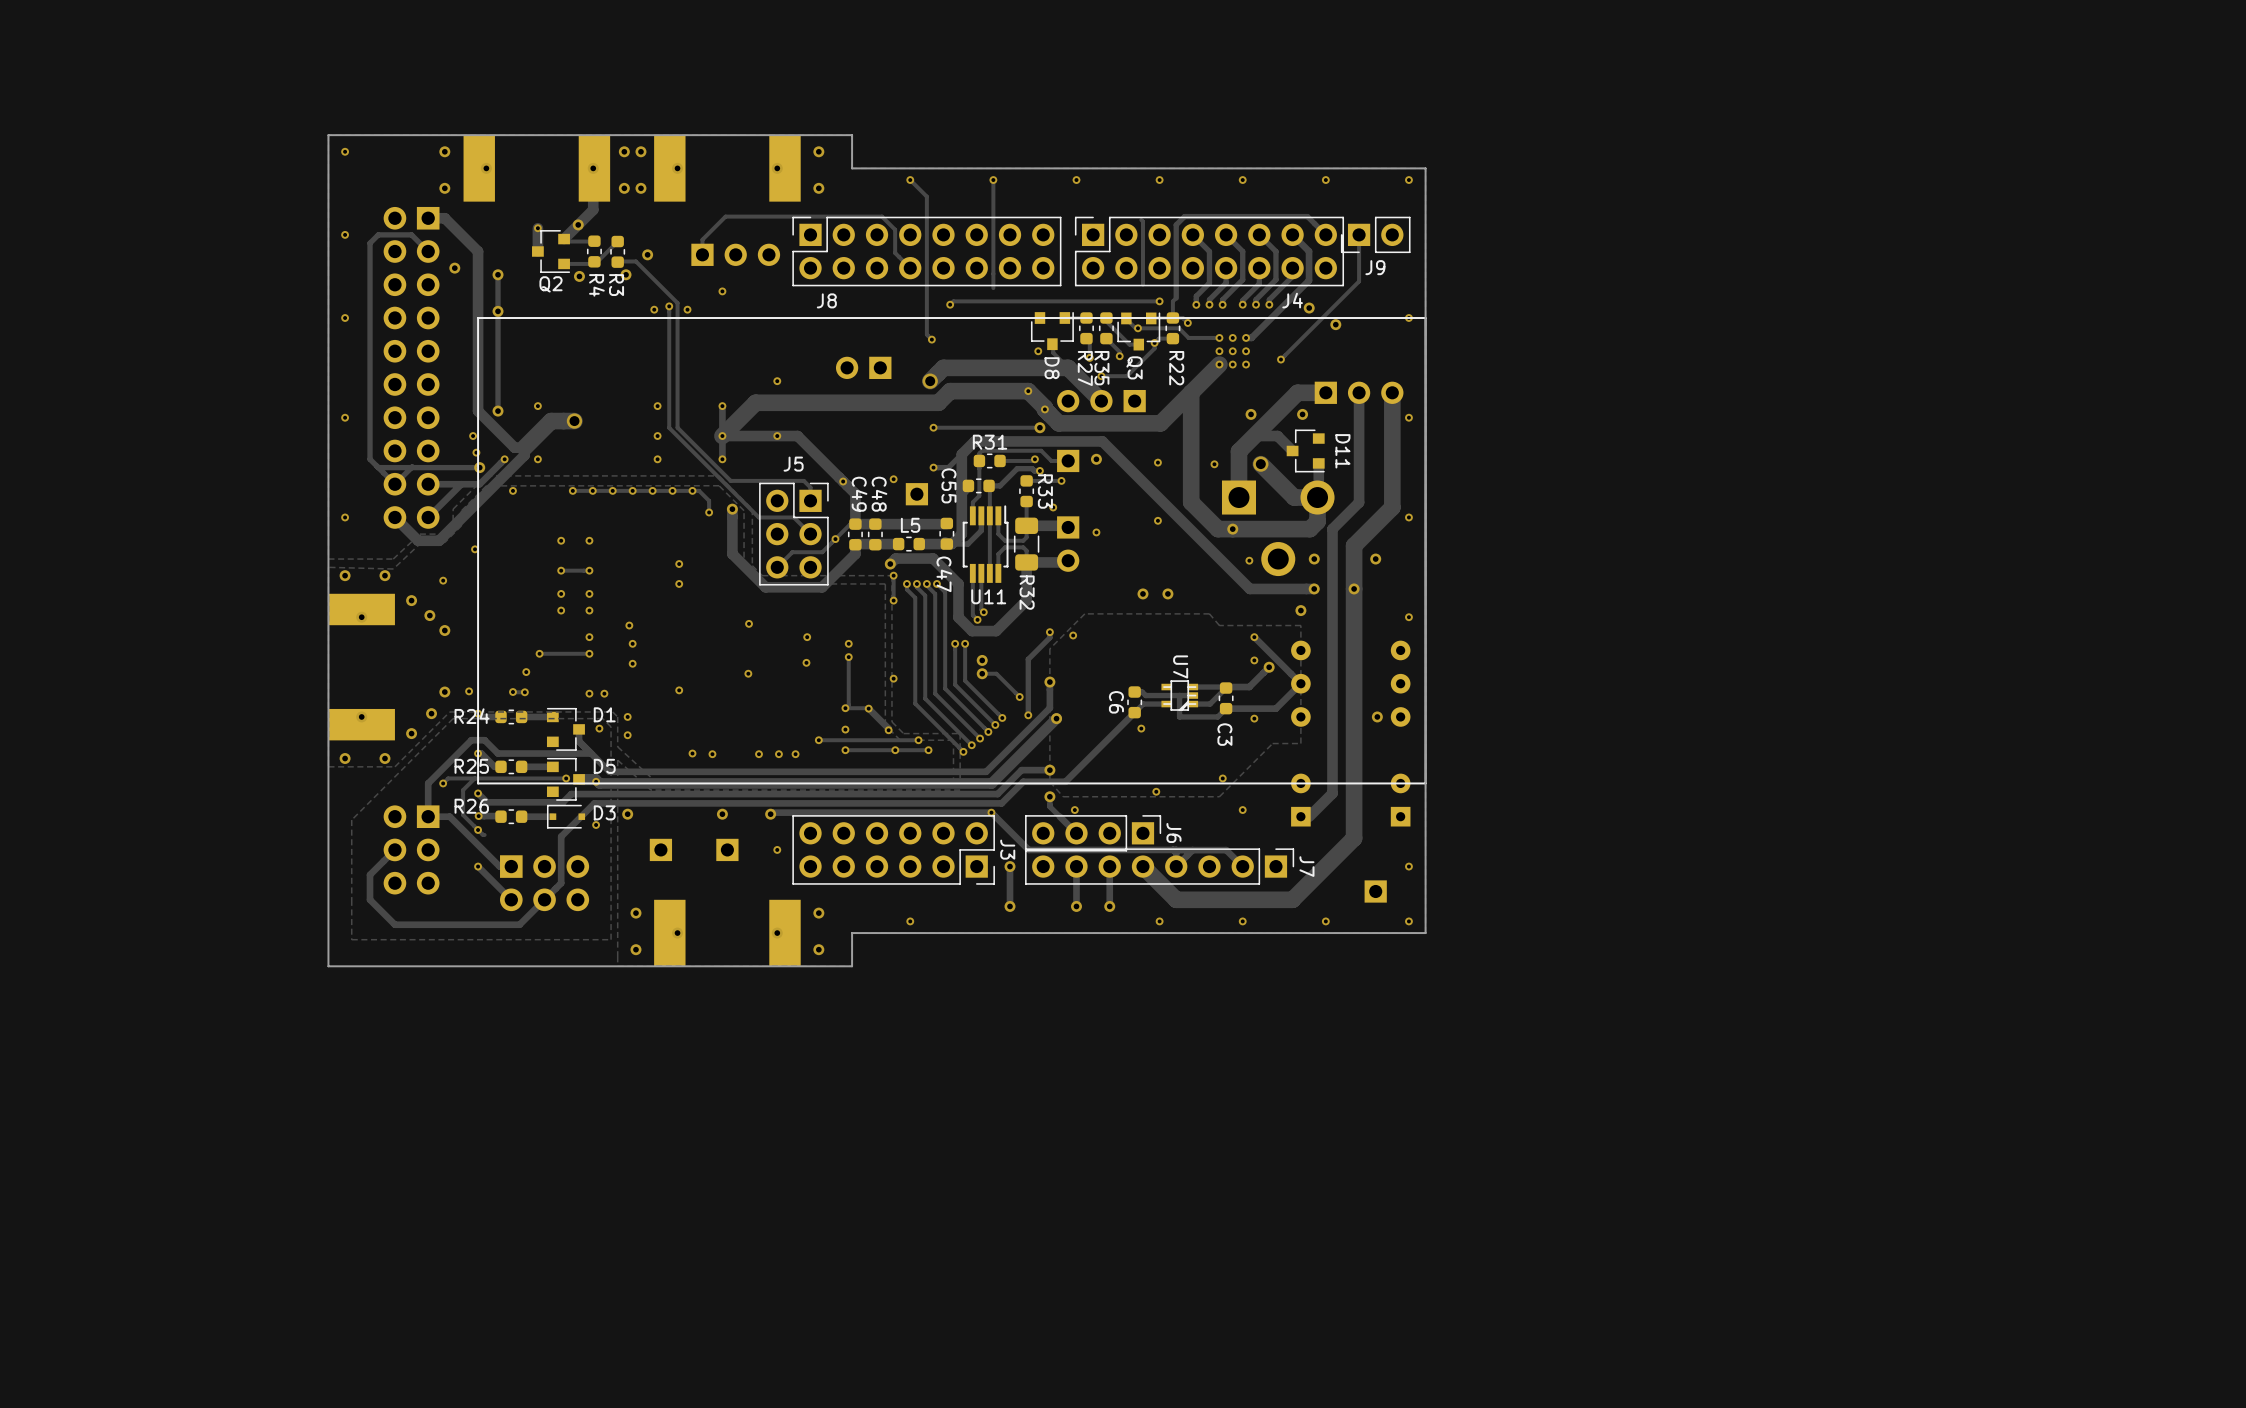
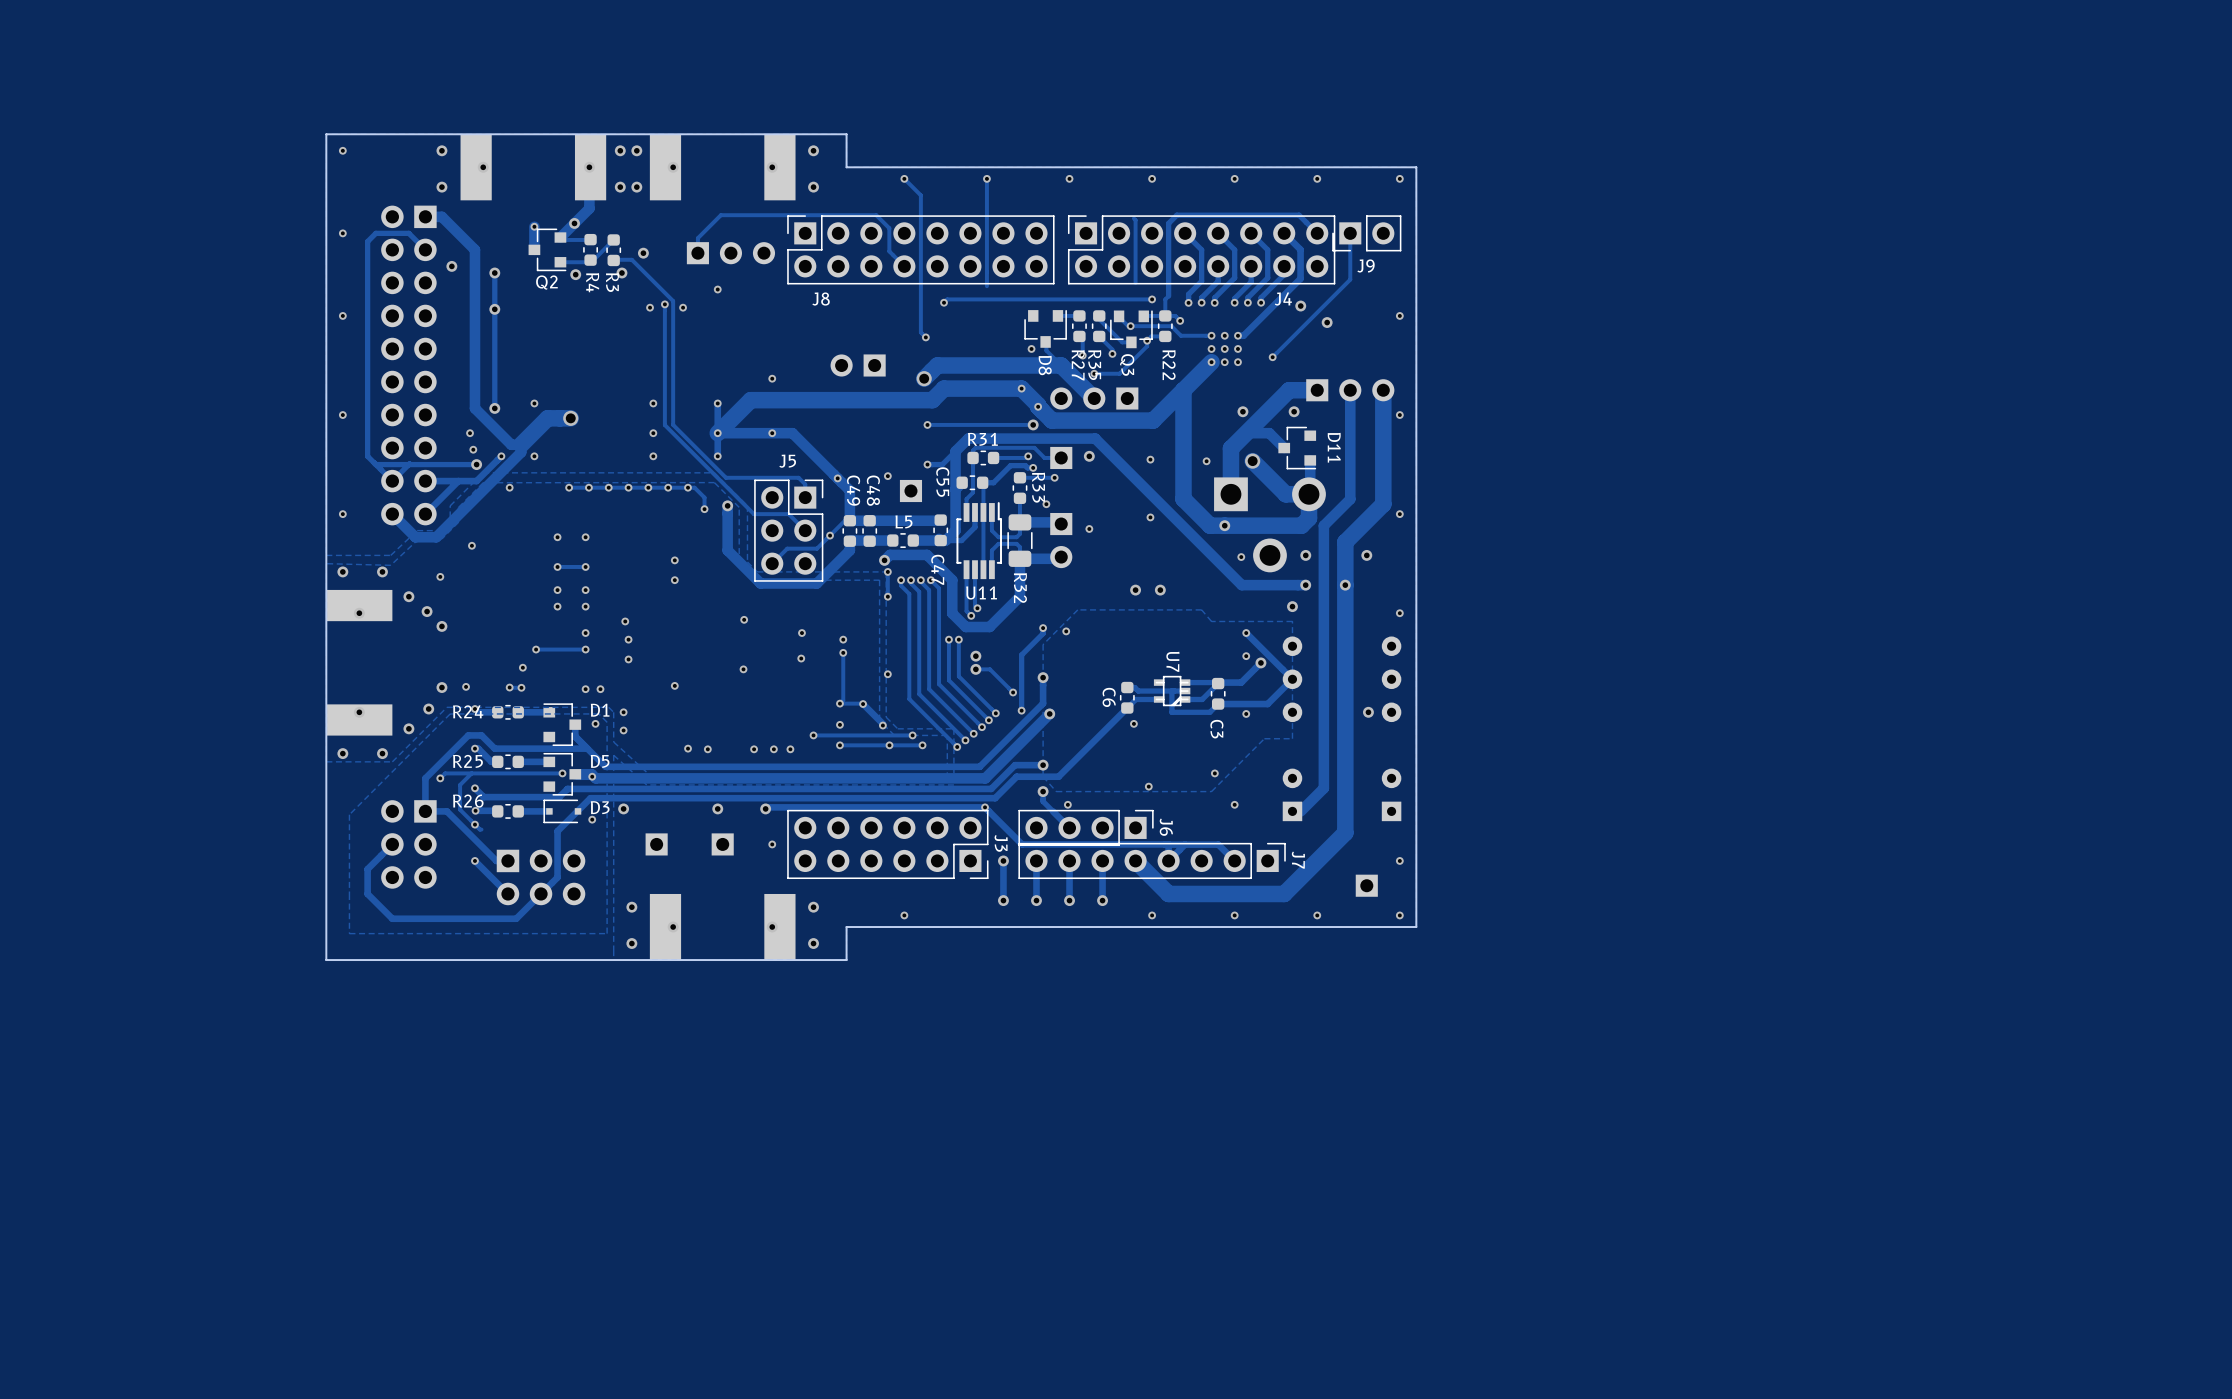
line: (1425, 318) (1425, 783) (478, 783) (478, 318) (1425, 318) -> none
track: none -> (1036, 860) (1036, 900)
via: none -> (1036, 900)

